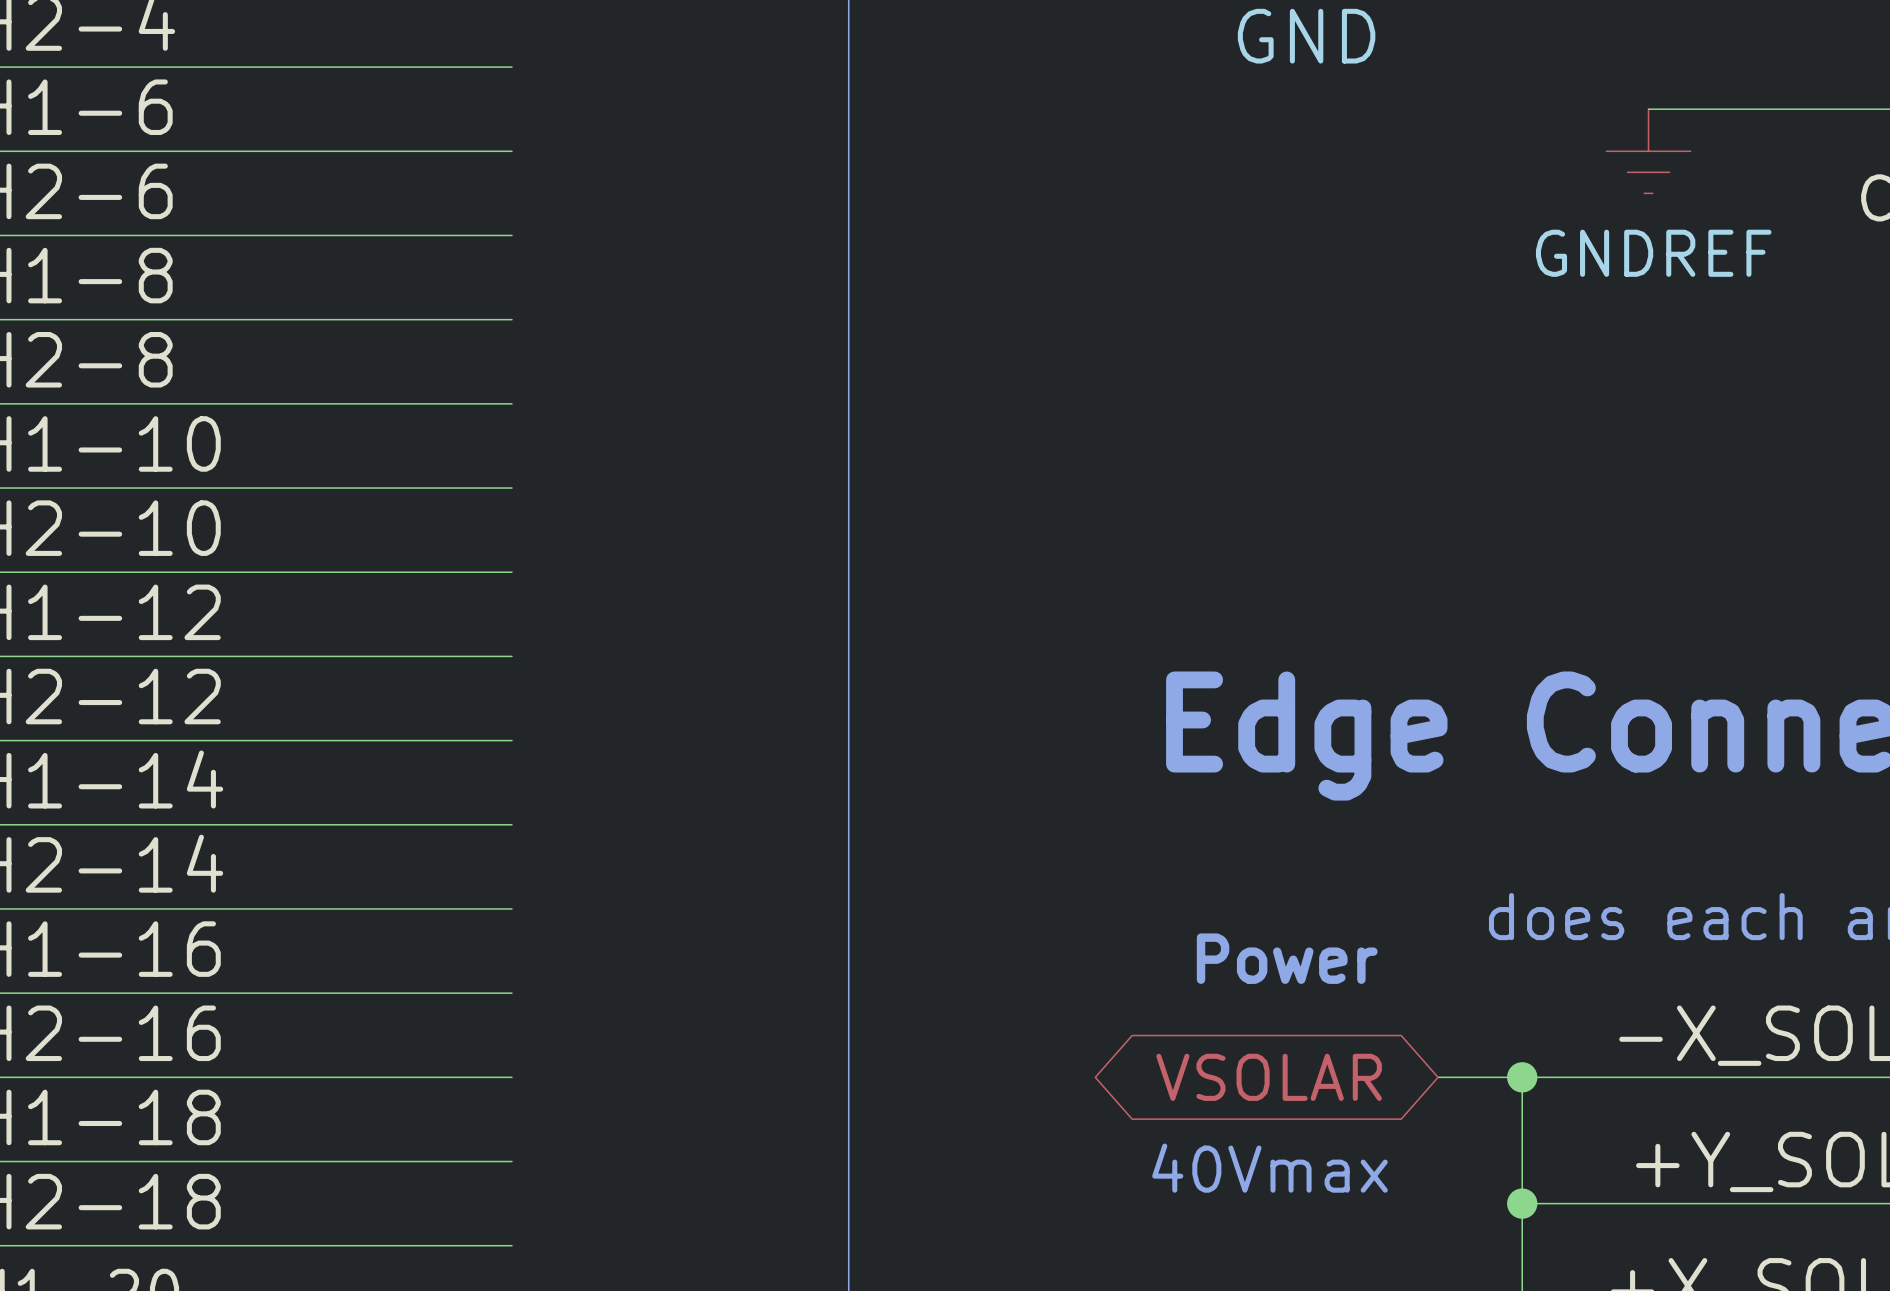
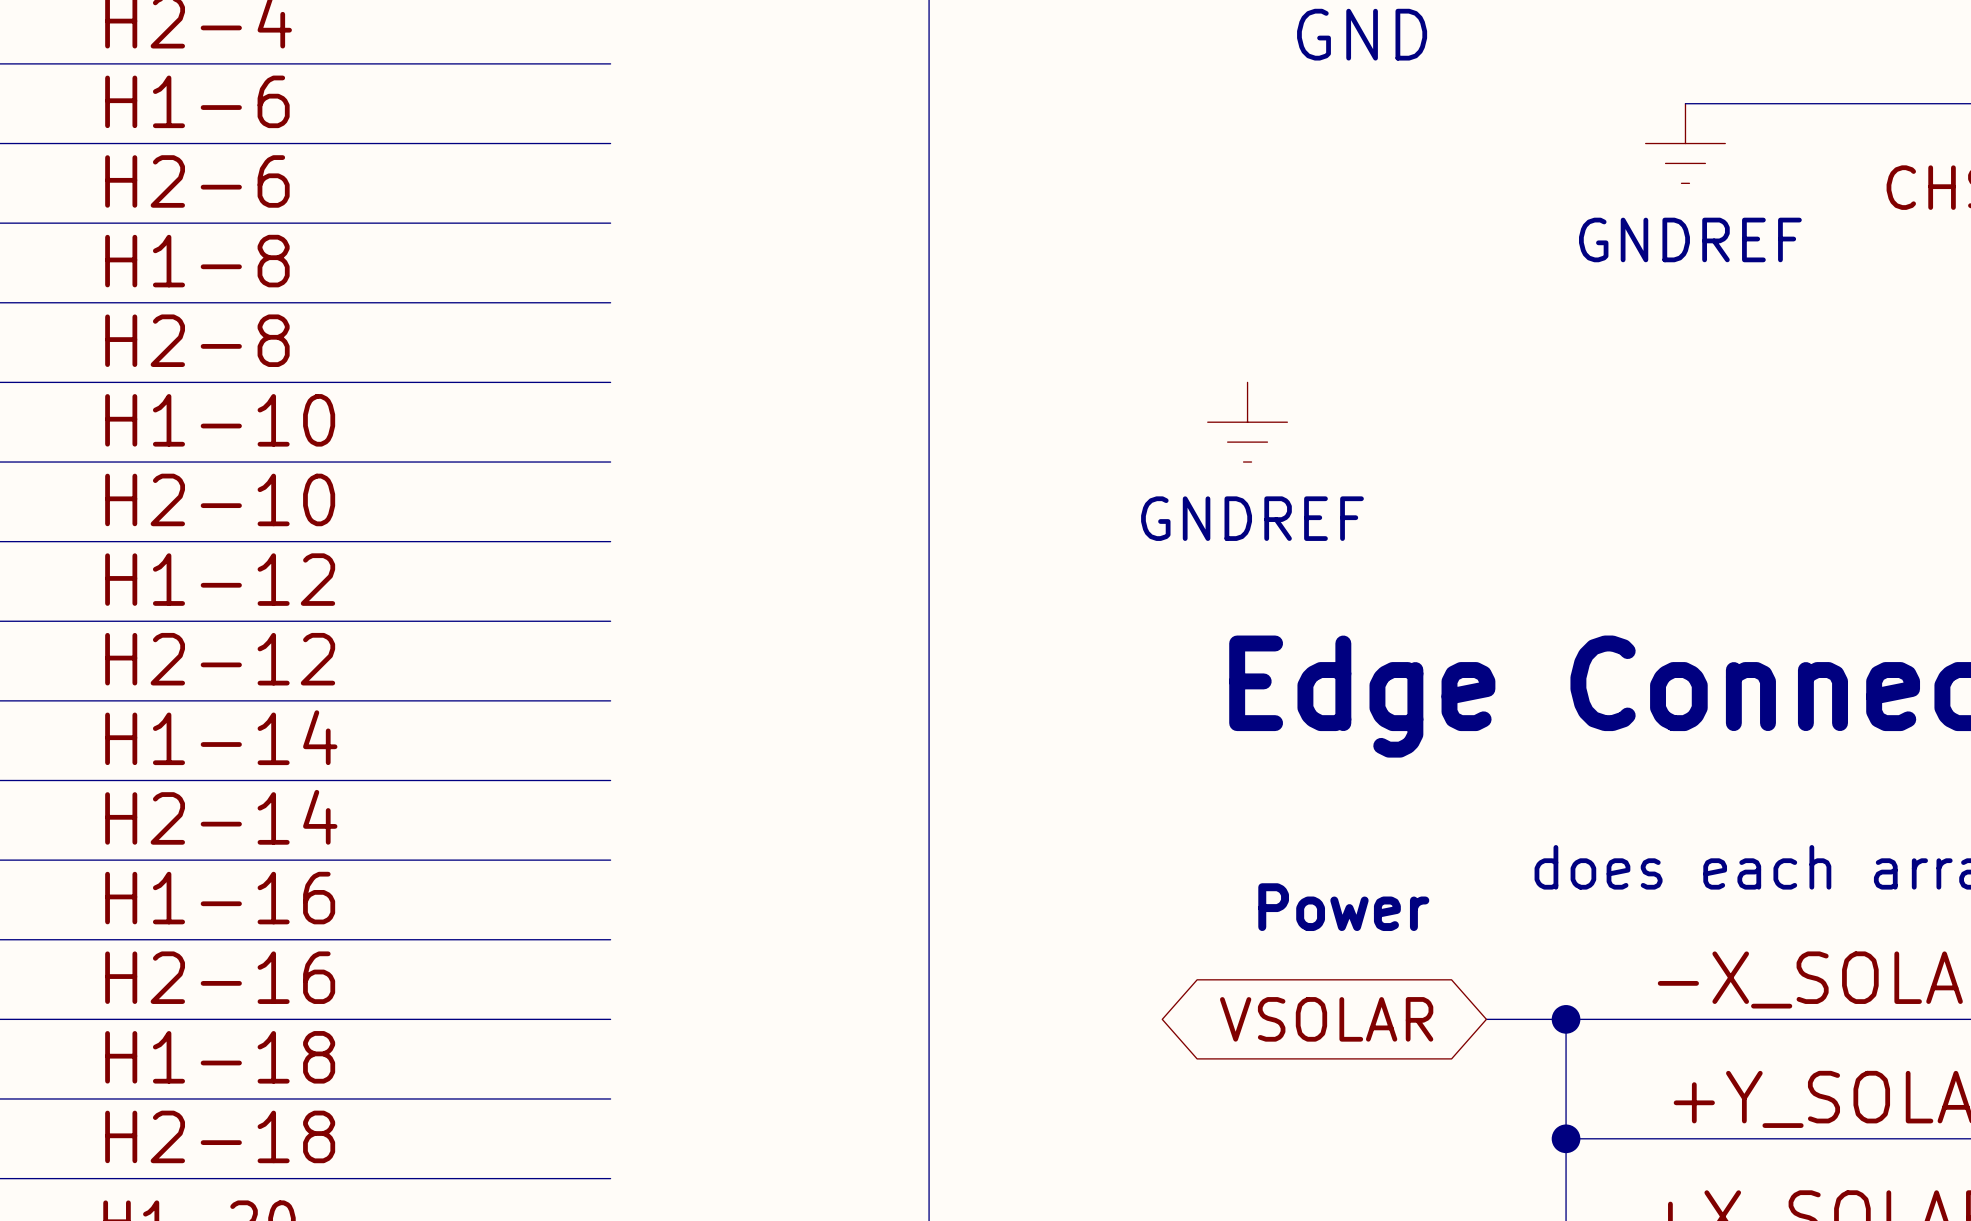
power symbol: none -> GNDREF (1247, 422)
text: 40Vmax (1269, 1168) -> none

